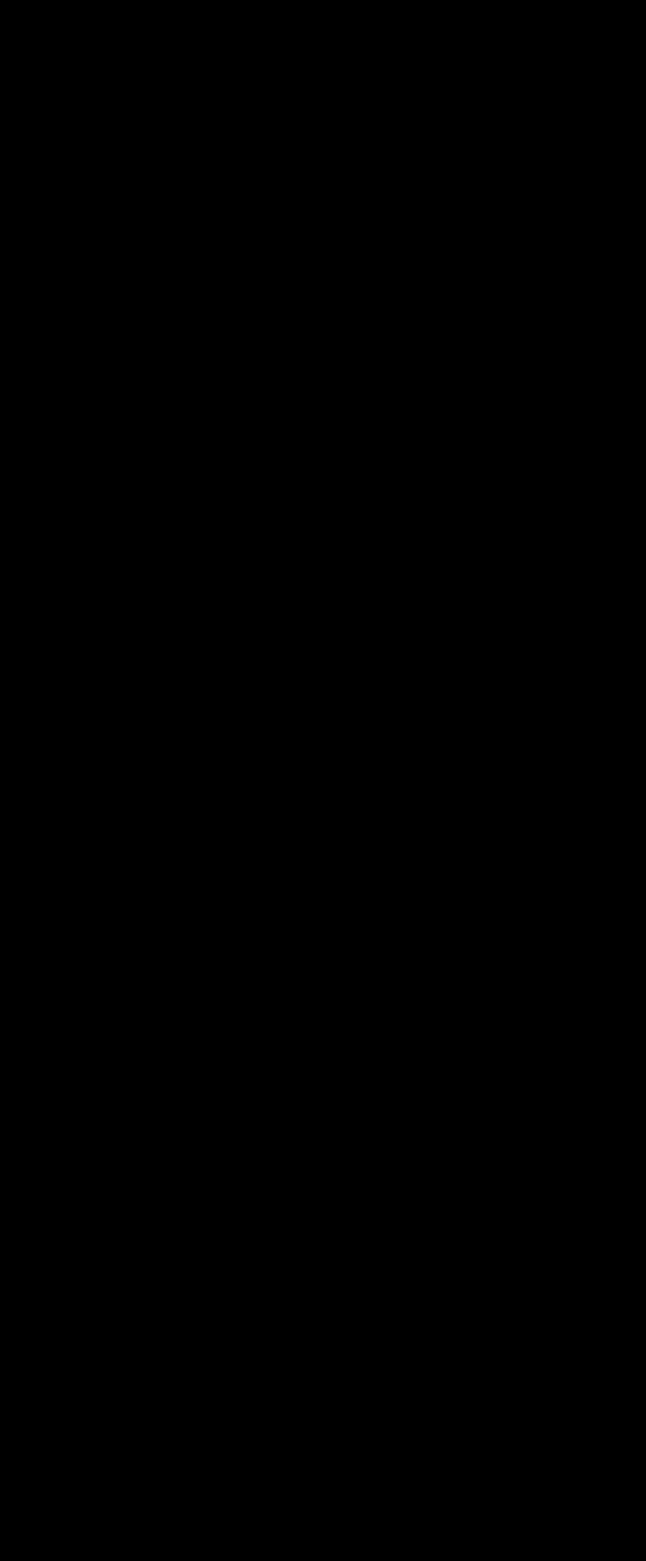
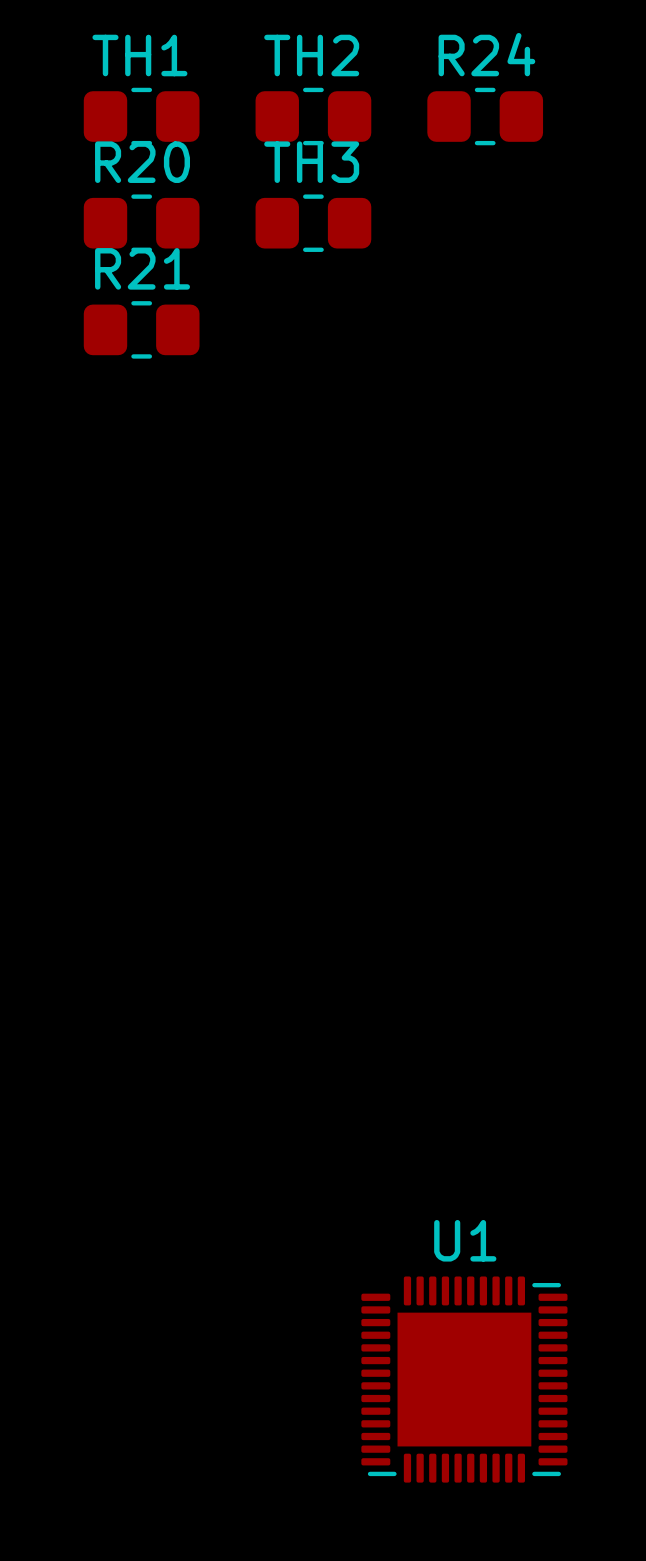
TH1: none -> (141, 116)
TH2: none -> (313, 116)
R24: none -> (485, 116)
R20: none -> (141, 223)
TH3: none -> (313, 223)
R21: none -> (141, 329)
U1: none -> (464, 1379)

